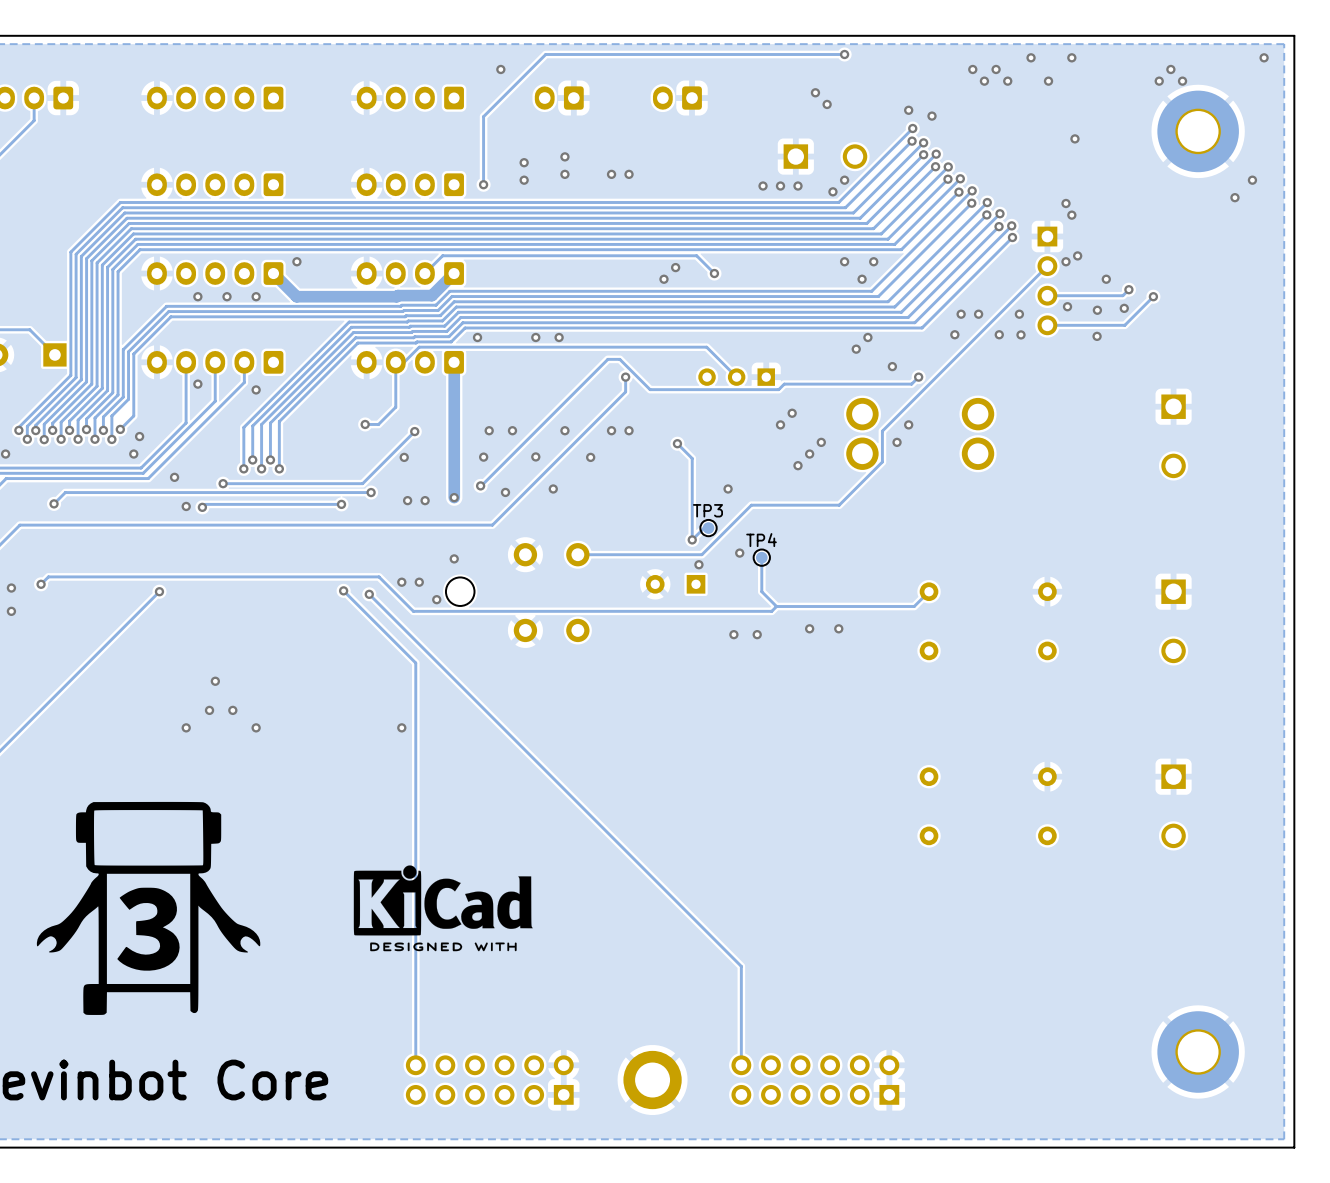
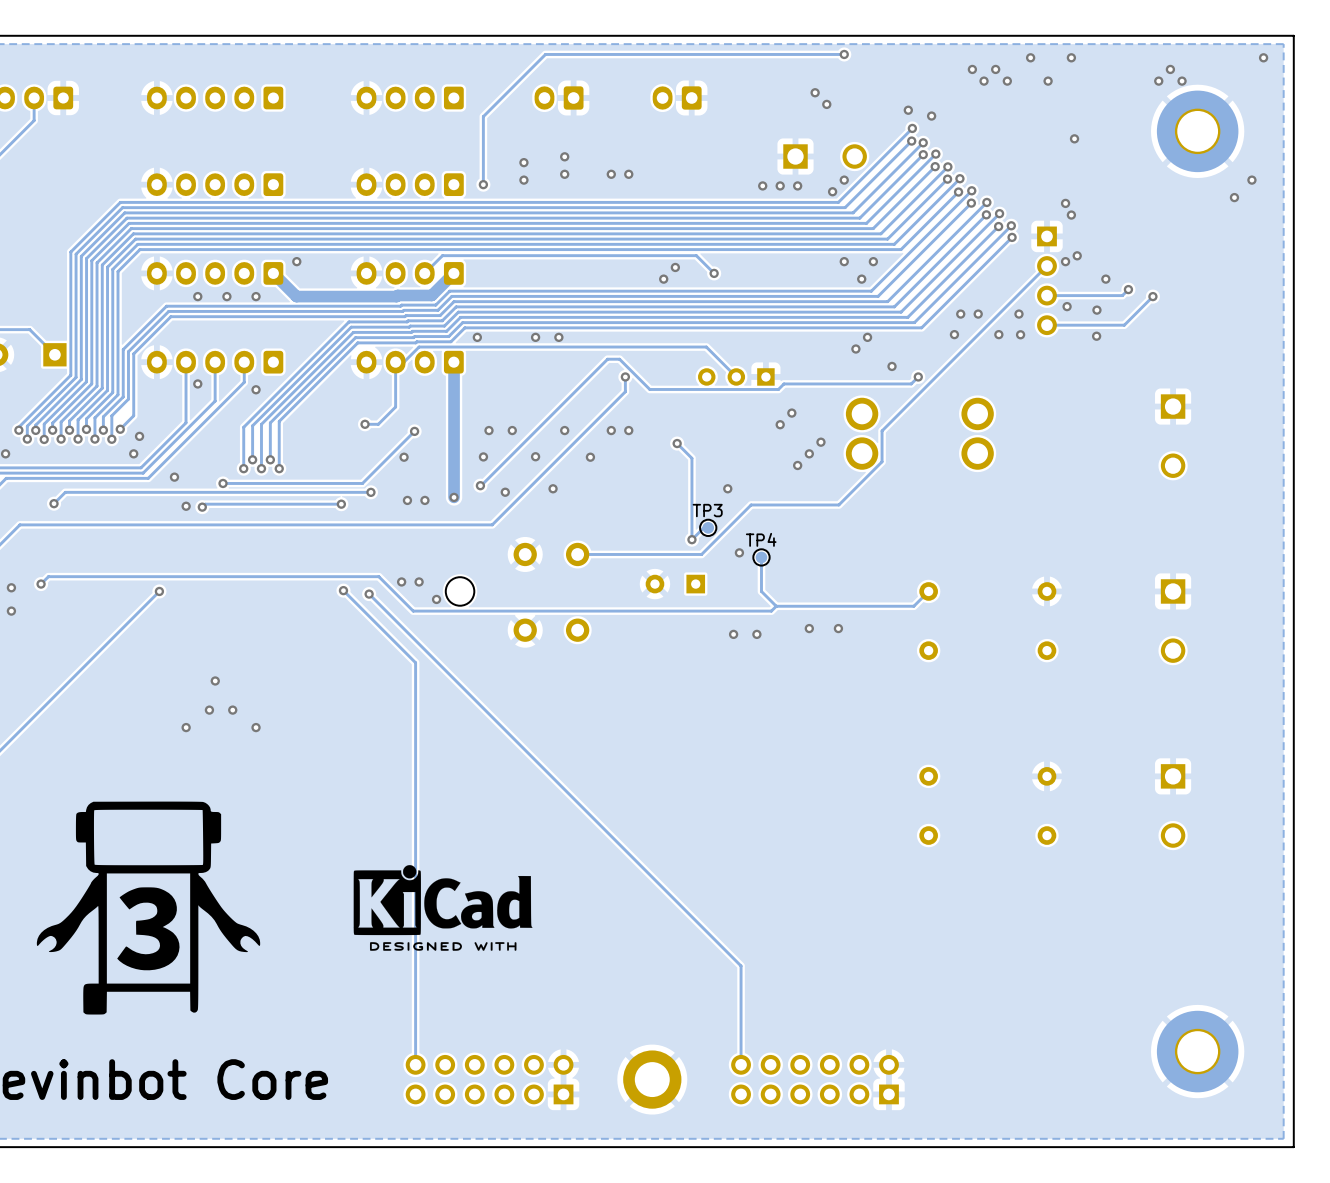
via: (500, 69) -> none
via: (1124, 308) -> none
via: (908, 424) -> none
via: (897, 442) -> none
via: (454, 558) -> none
via: (698, 564) -> none
via: (401, 727) -> none

